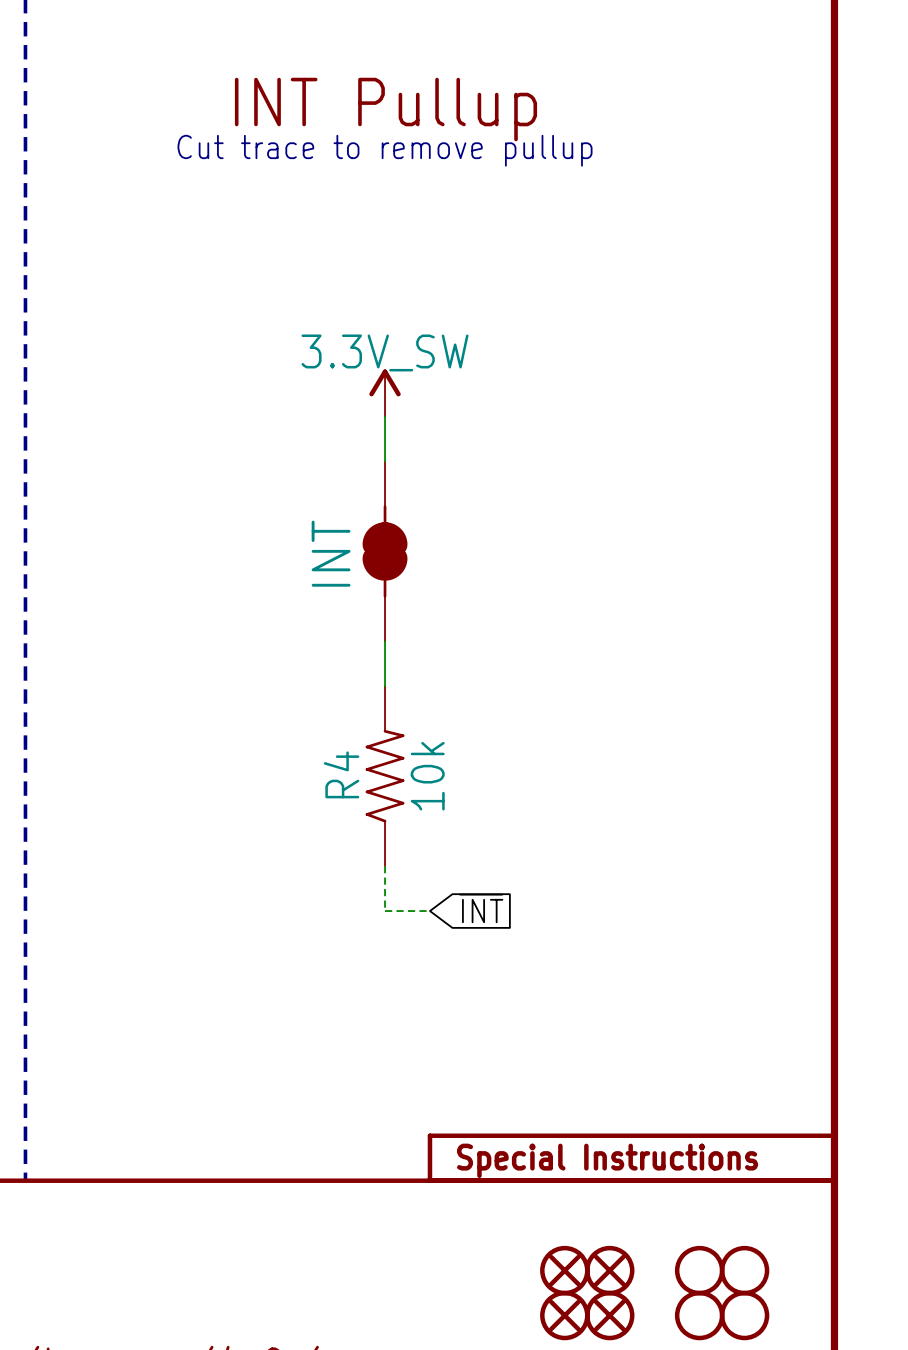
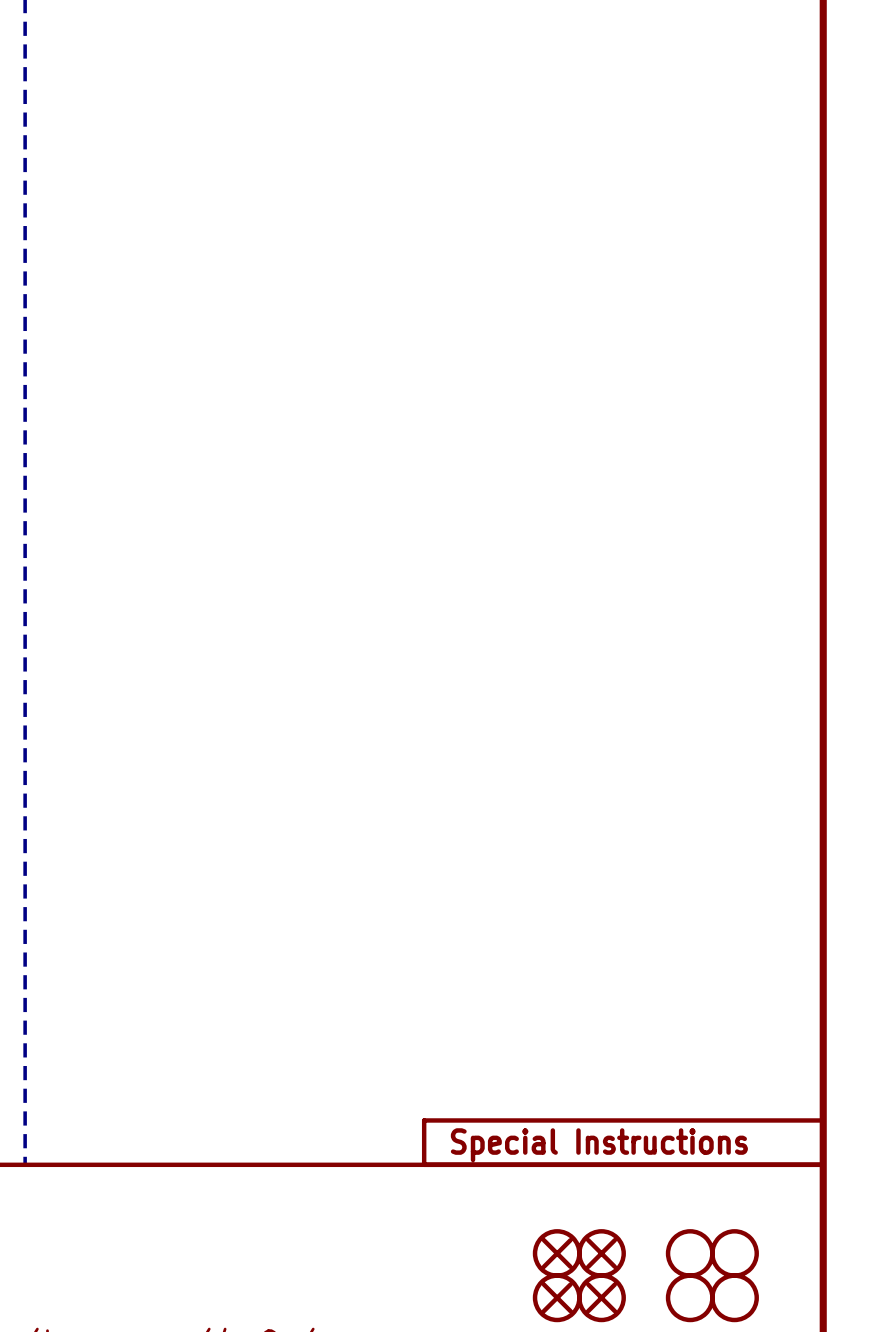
text: INT Pullup (385, 109) -> none
text: Cut trace to remove pullup (385, 150) -> none
power symbol: 3.3V_SW (385, 393) -> none
wire: (385, 416) (385, 461) -> none
part: (385, 551) -> none
text: INT (331, 553) -> none
wire: (385, 641) (385, 686) -> none
R4: 10k (385, 776) -> none
wire: (385, 866) (385, 911) (429, 911) -> none
global label: ~{INT} (481, 908) -> none

